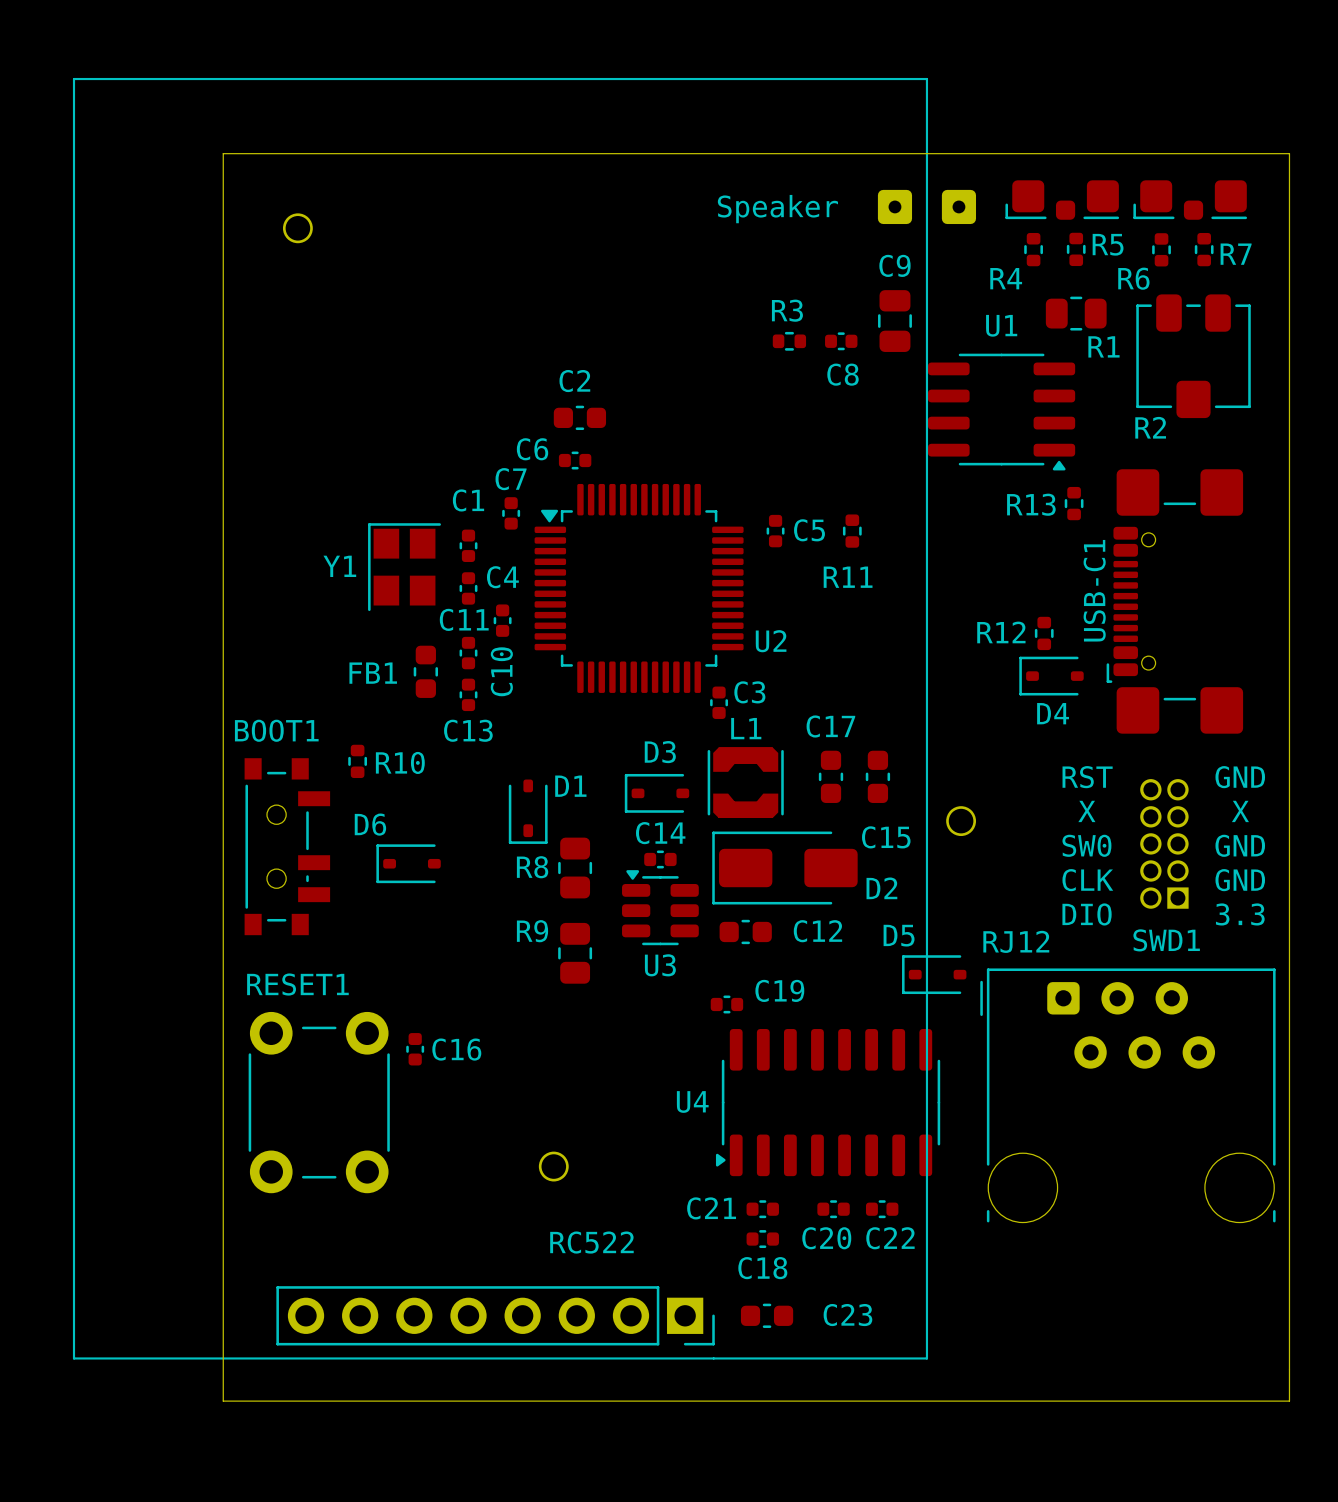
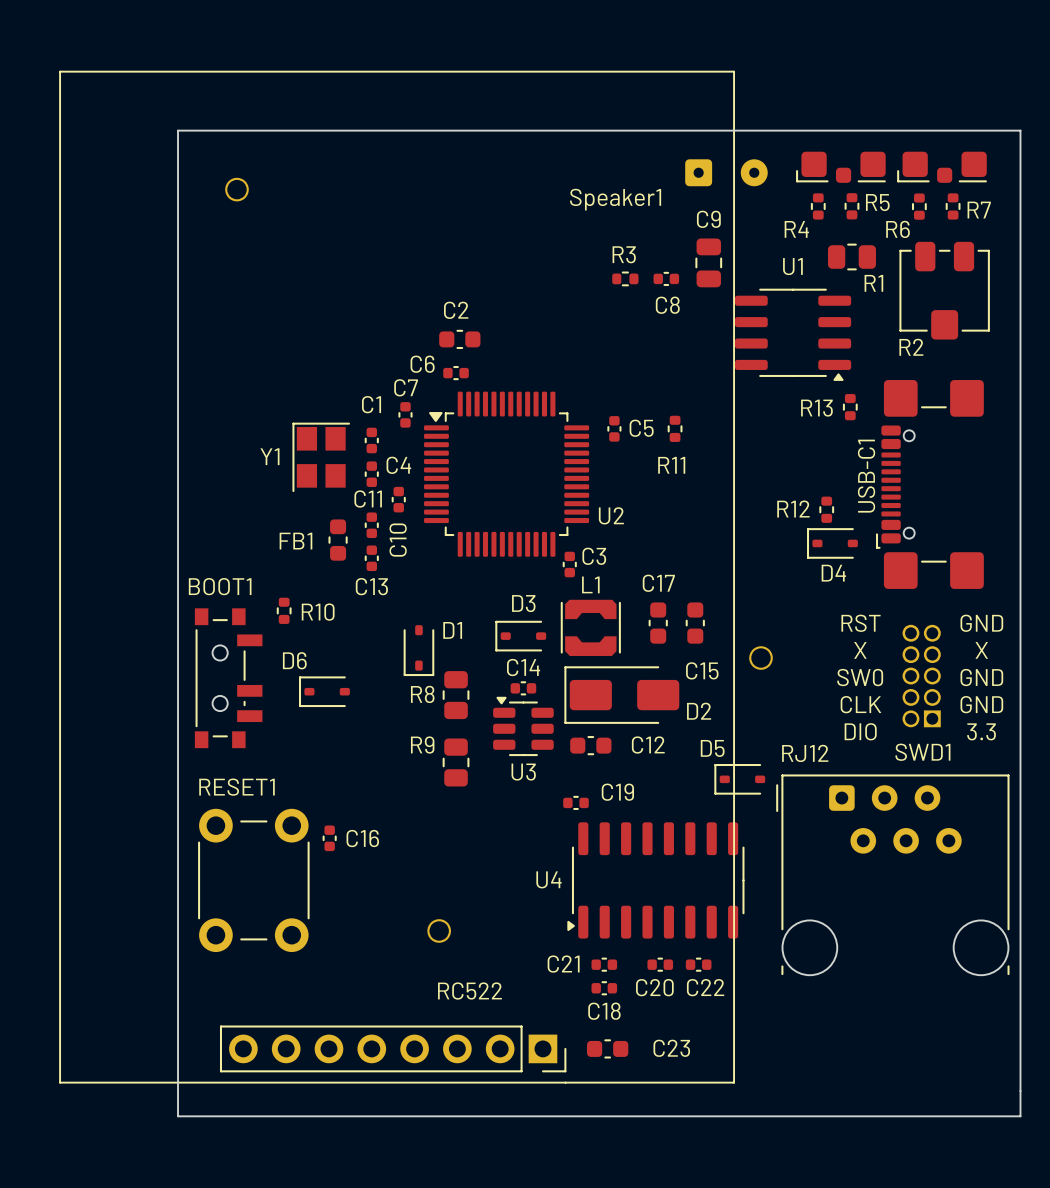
part: (894, 206) -> none
Speaker1: none -> (726, 172)
part: (958, 206) -> none
text: Speaker (777, 209) -> none

